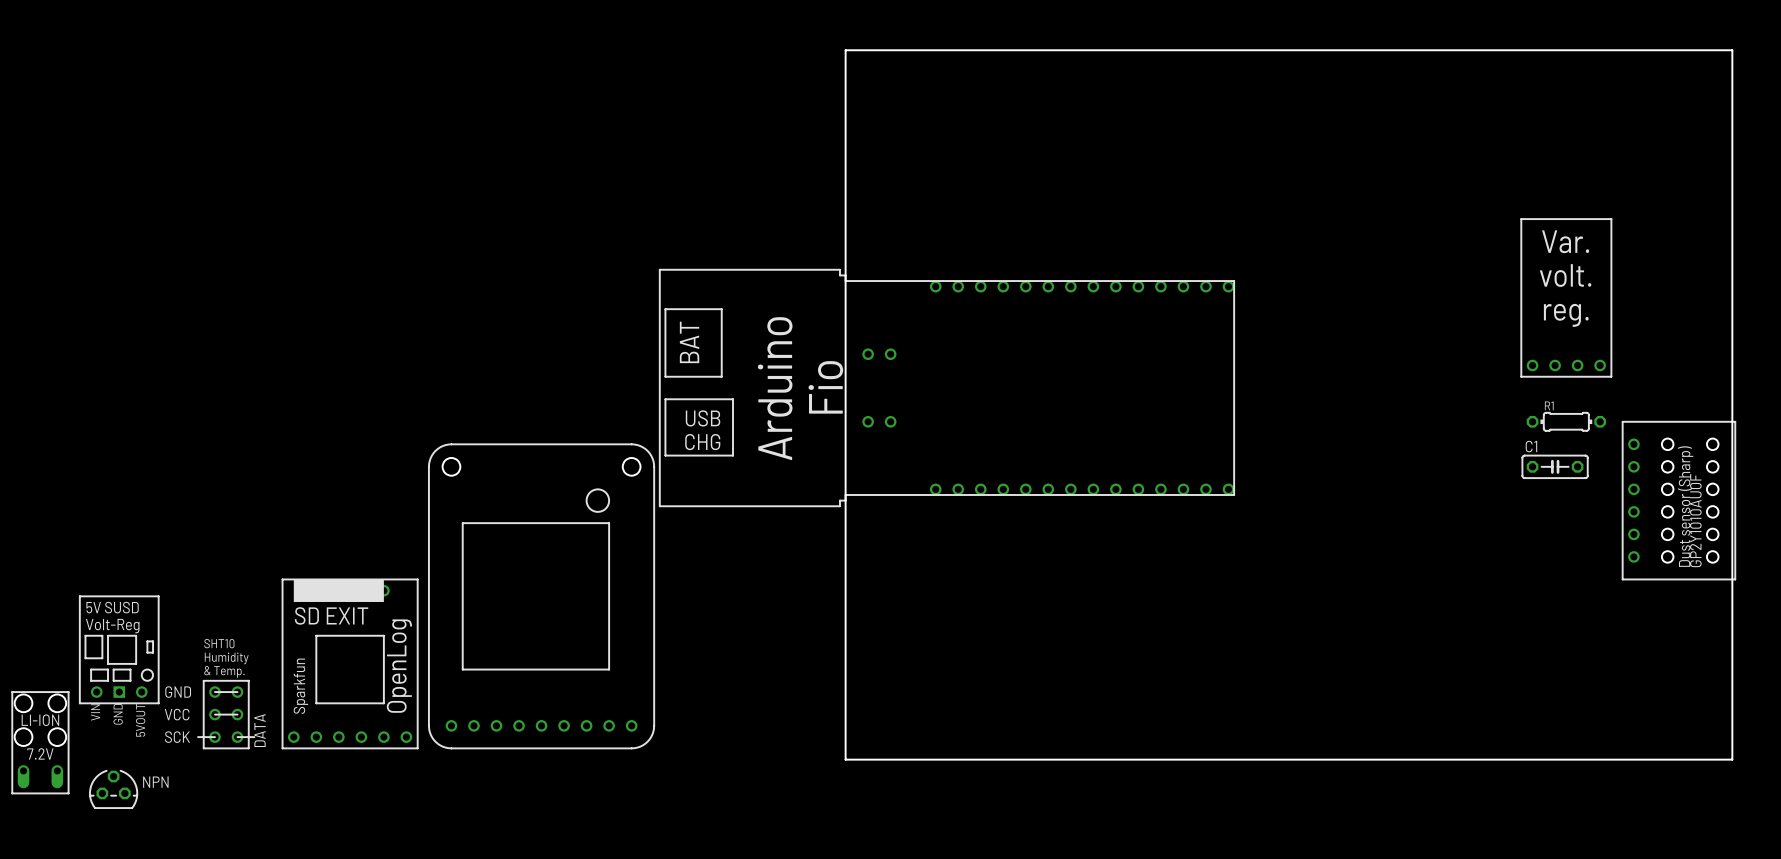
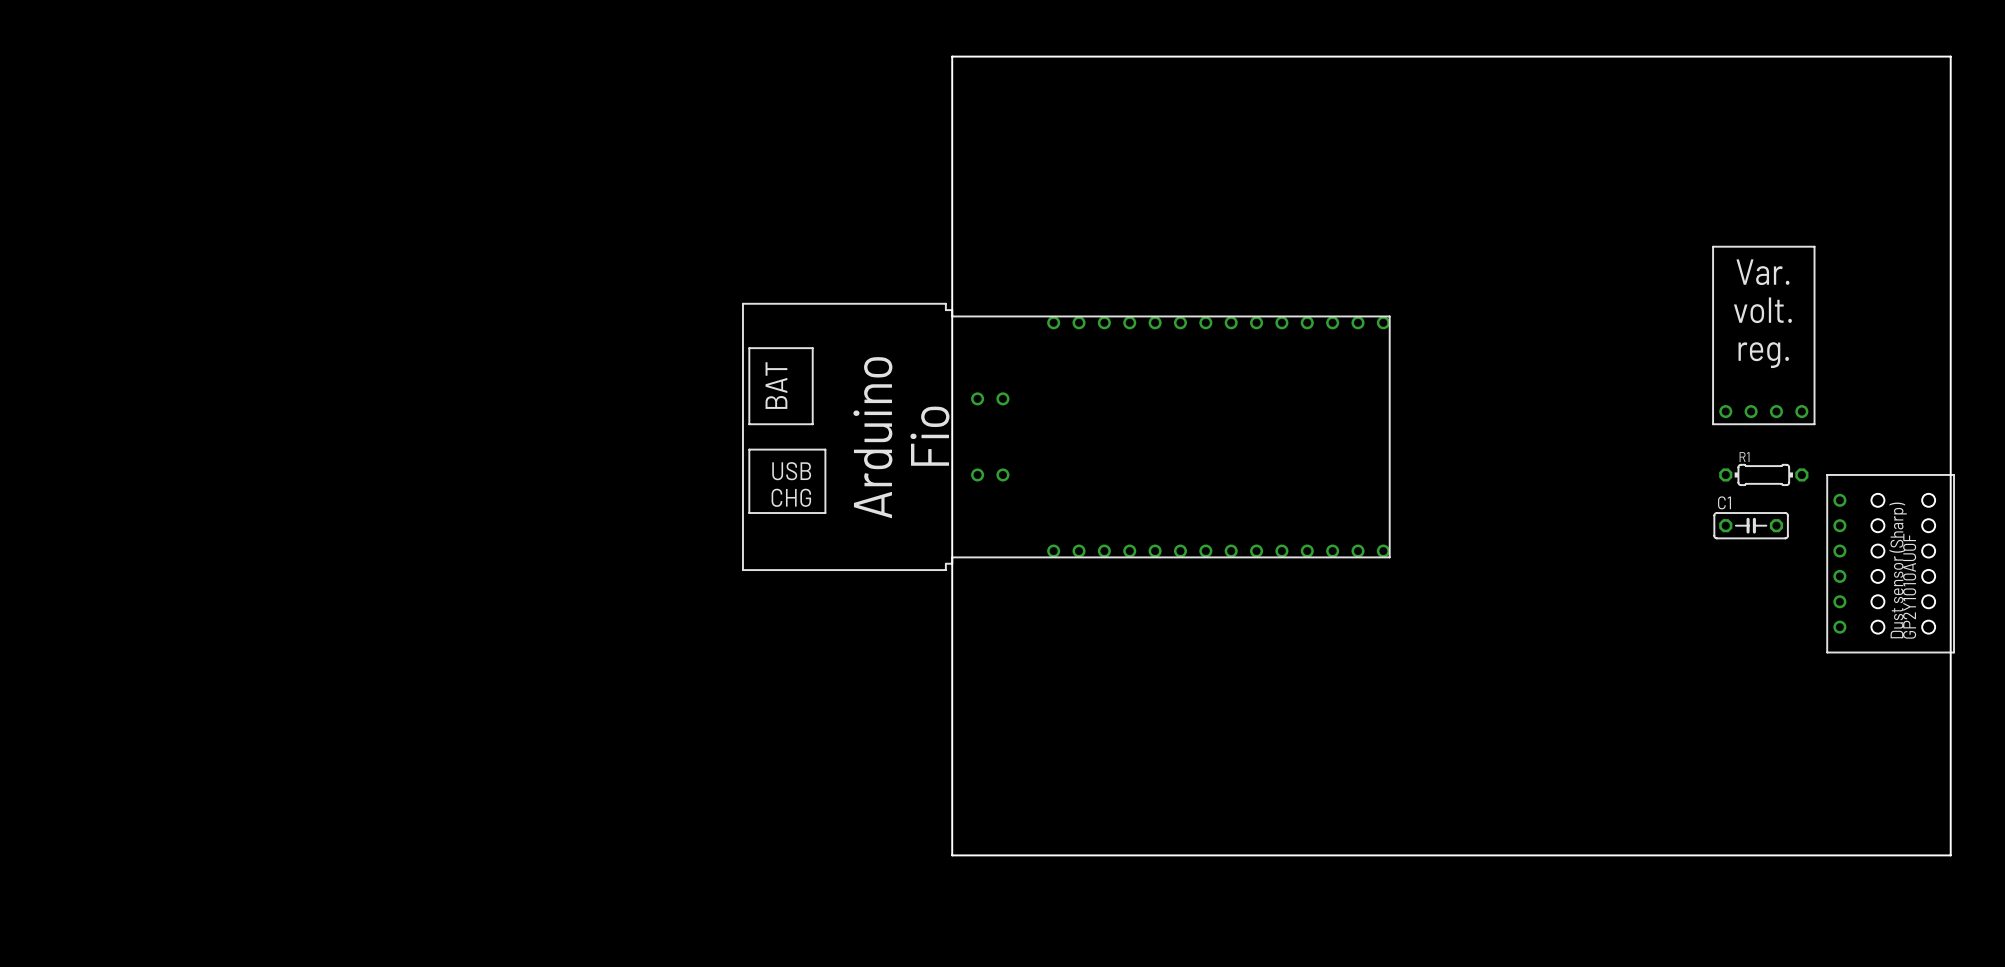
part: (541, 596) -> none
part: (119, 649) -> none
part: (350, 663) -> none
part: (226, 714) -> none
LI-ION: 7.2V (40, 742) -> none
NPN: (113, 789) -> none

